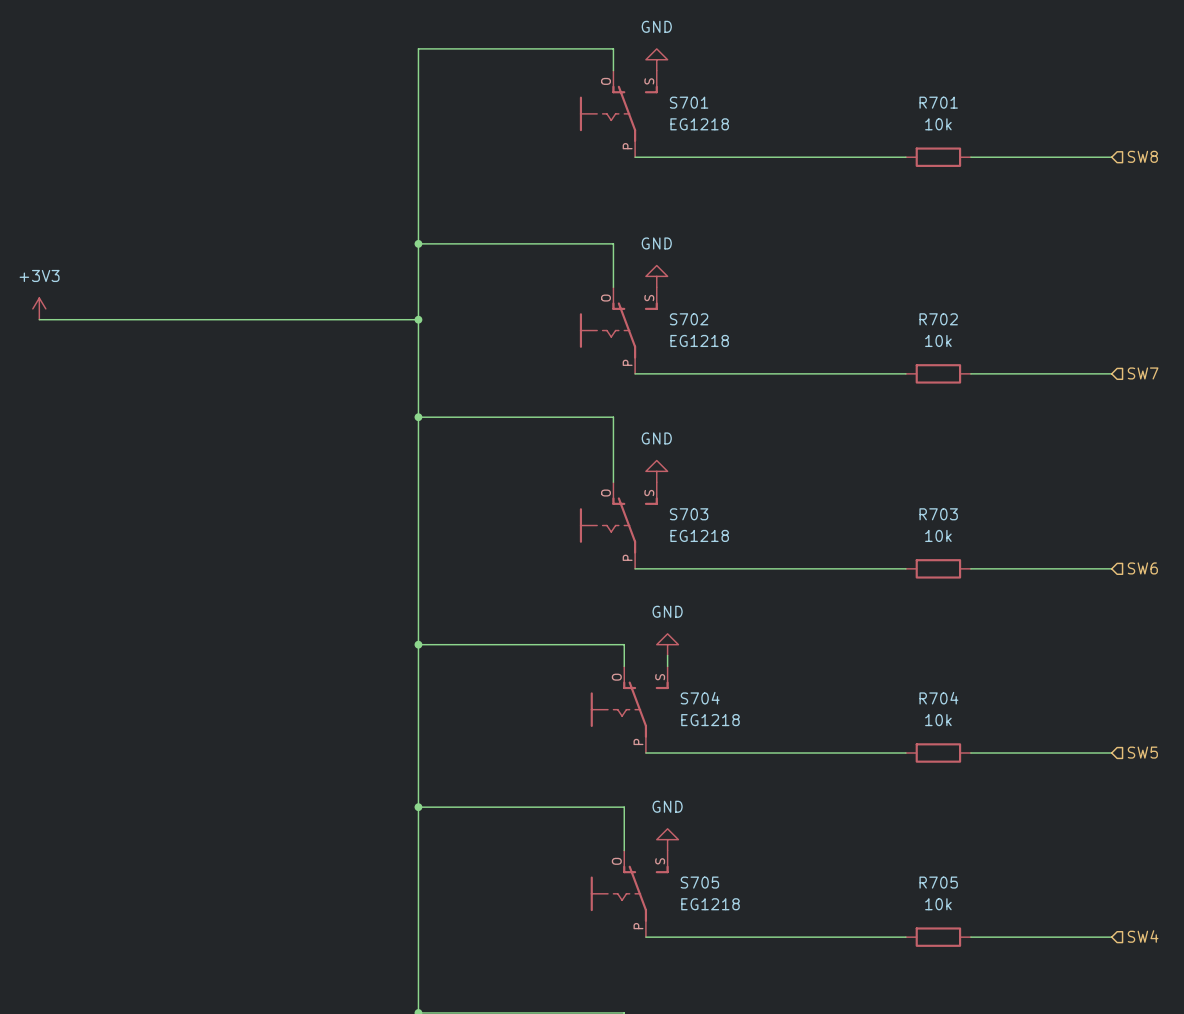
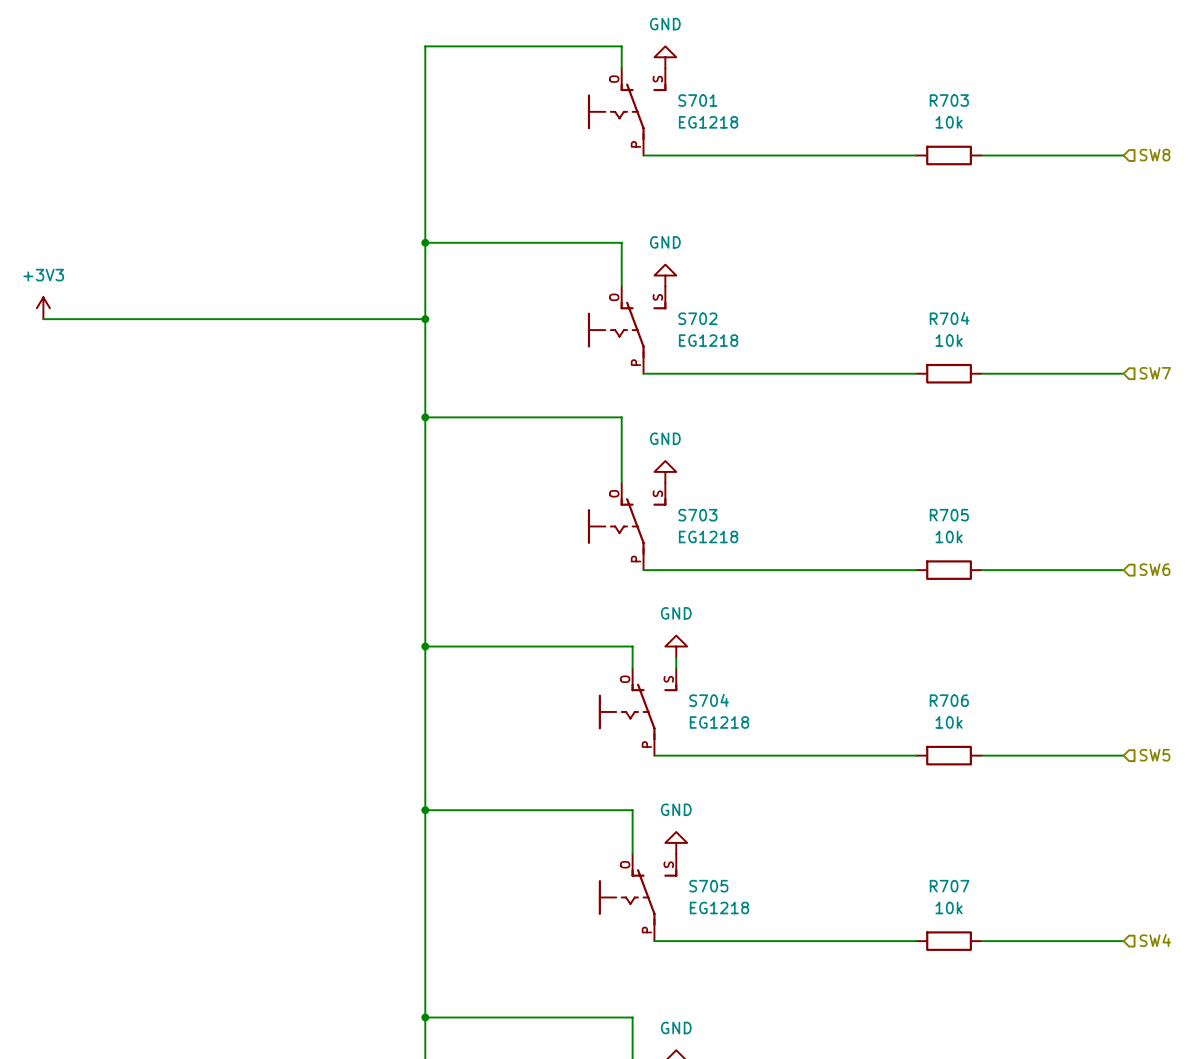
R701 name: R701 (938, 102) -> R703 (949, 100)
R702 name: R702 (938, 319) -> R704 (949, 318)
R703 name: R703 (938, 514) -> R705 (949, 515)
R704 name: R704 (938, 698) -> R706 (949, 700)
R705 name: R705 (938, 882) -> R707 (949, 886)

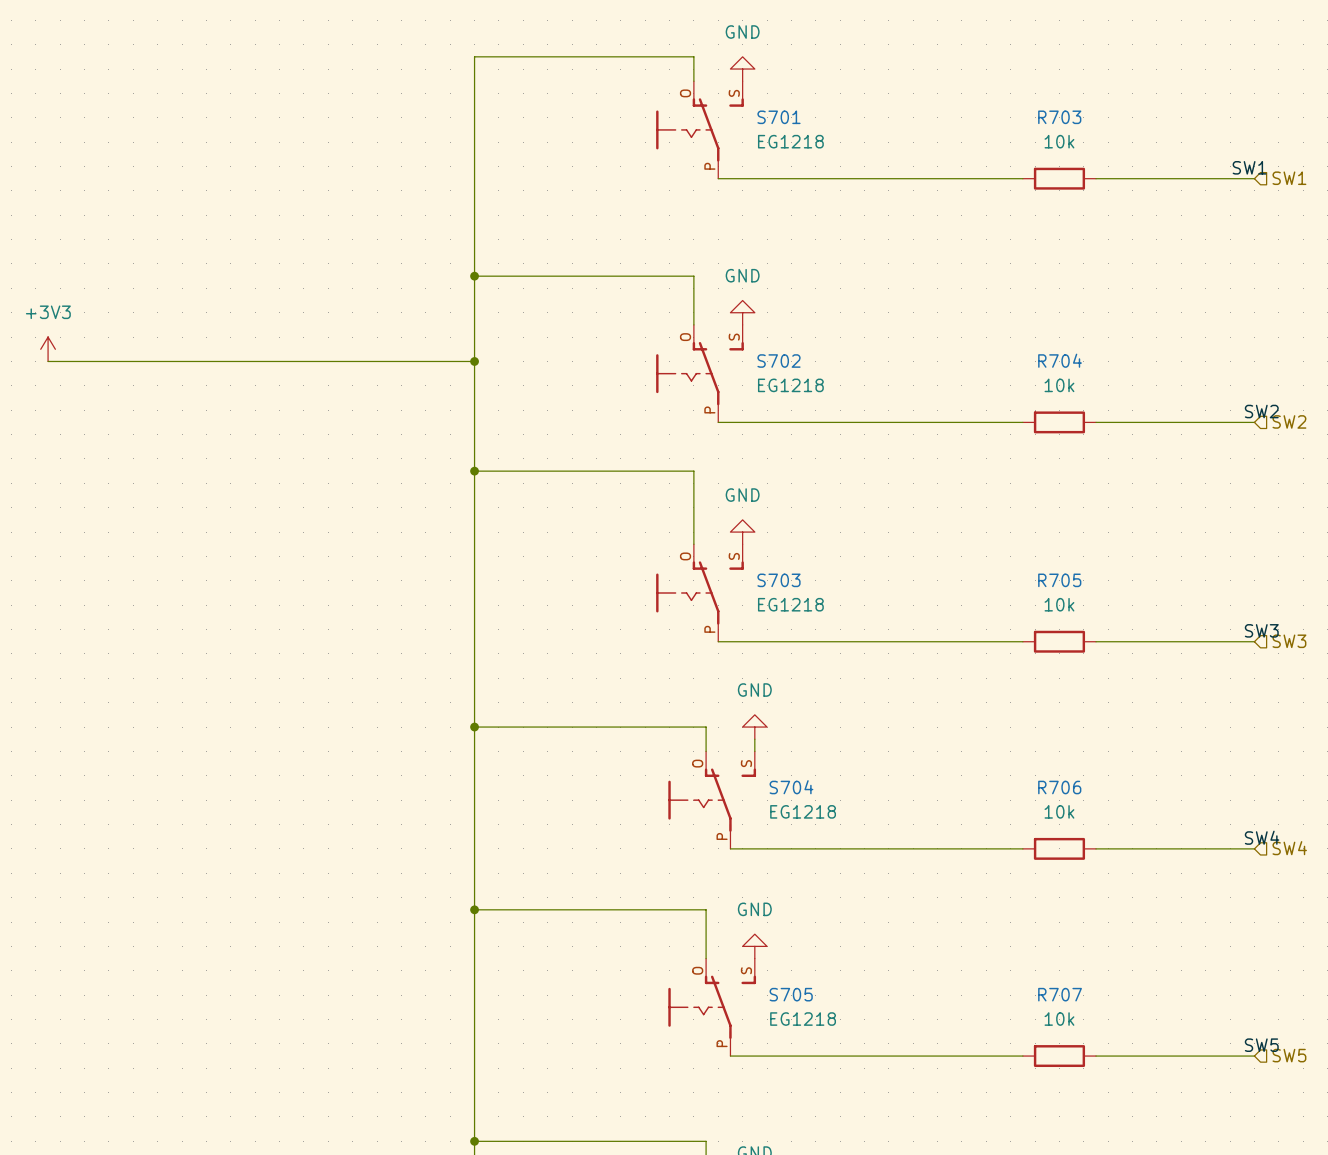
label: none -> SW1 (1249, 167)
hierarchical label: SW8 (1154, 155) -> SW1 (1289, 178)
label: none -> SW2 (1261, 411)
hierarchical label: SW7 (1155, 373) -> SW2 (1289, 421)
label: none -> SW3 (1261, 630)
hierarchical label: SW6 (1154, 569) -> SW3 (1289, 641)
label: none -> SW4 (1262, 837)
hierarchical label: SW5 (1154, 755) -> SW4 (1289, 848)
label: none -> SW5 (1261, 1045)
hierarchical label: SW4 (1155, 940) -> SW5 (1289, 1055)

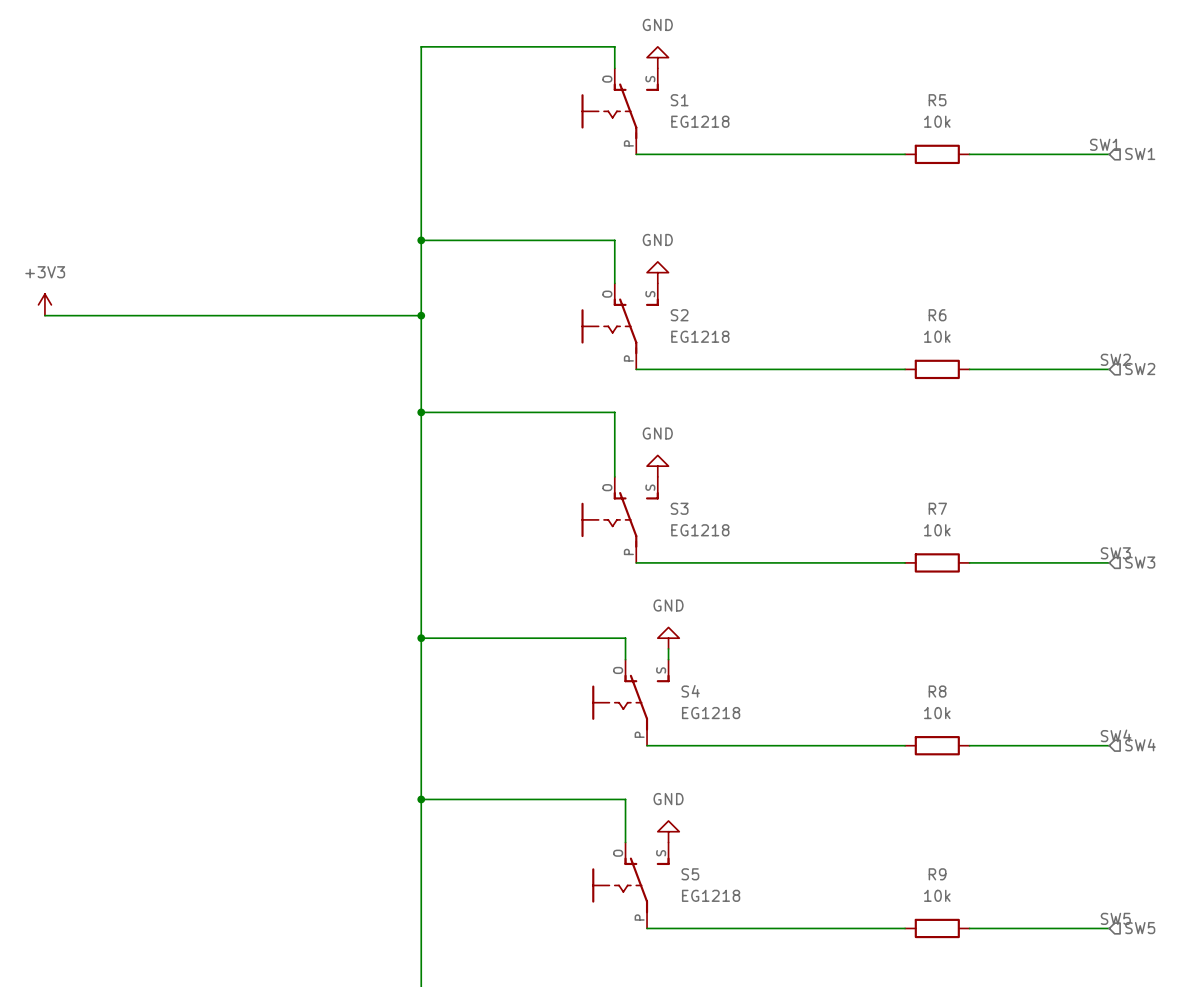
S701 name: S701 (778, 117) -> S1 (679, 100)
R703 name: R703 (1059, 117) -> R5 (937, 100)
R704 name: R704 (1060, 360) -> R6 (937, 315)
S702 name: S702 (778, 361) -> S2 (679, 315)
S703 name: S703 (778, 580) -> S3 (679, 508)
R705 name: R705 (1059, 580) -> R7 (937, 508)
S704 name: S704 (791, 787) -> S4 (690, 691)
R706 name: R706 (1059, 787) -> R8 (937, 691)
S705 name: S705 (791, 994) -> S5 (690, 874)
R707 name: R707 (1060, 994) -> R9 (937, 874)

